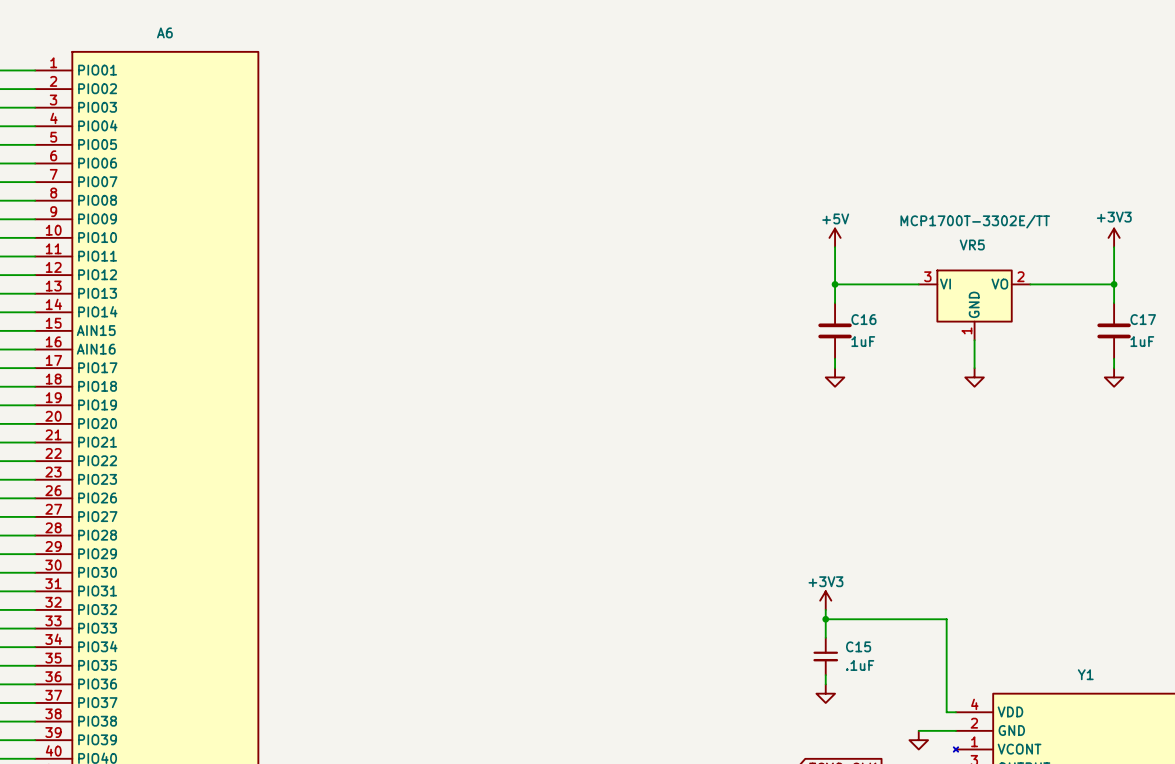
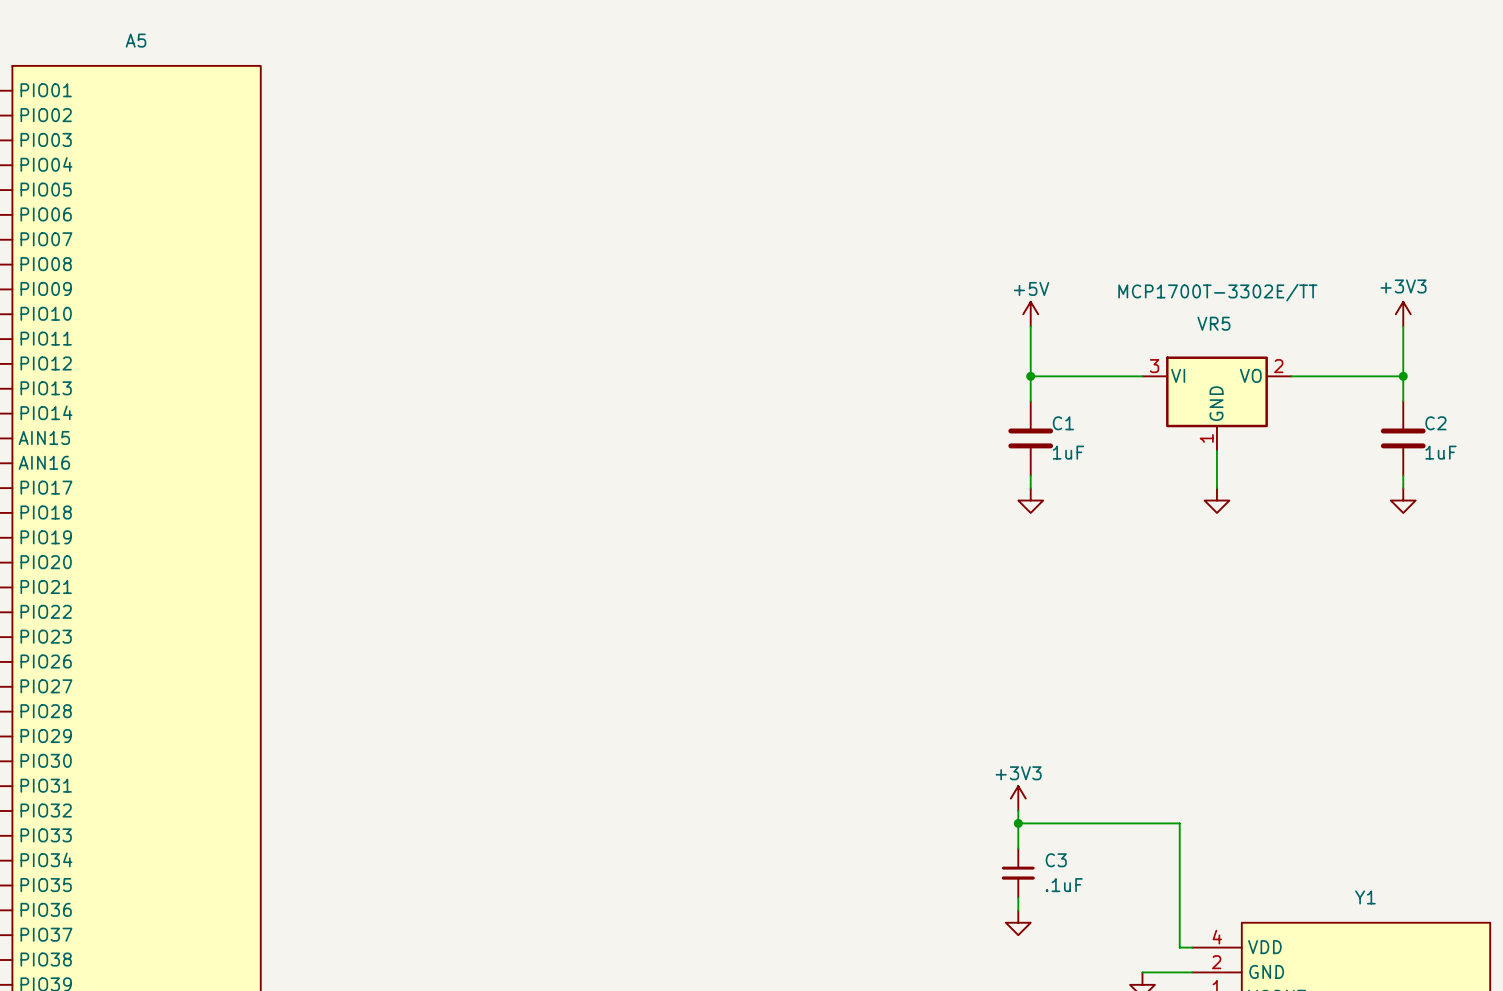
A6 name: A6 (164, 32) -> A5 (136, 40)
C16 name: C16 (863, 319) -> C1 (1063, 423)
C17 name: C17 (1143, 319) -> C2 (1435, 423)
C15 name: C15 (858, 646) -> C3 (1056, 860)

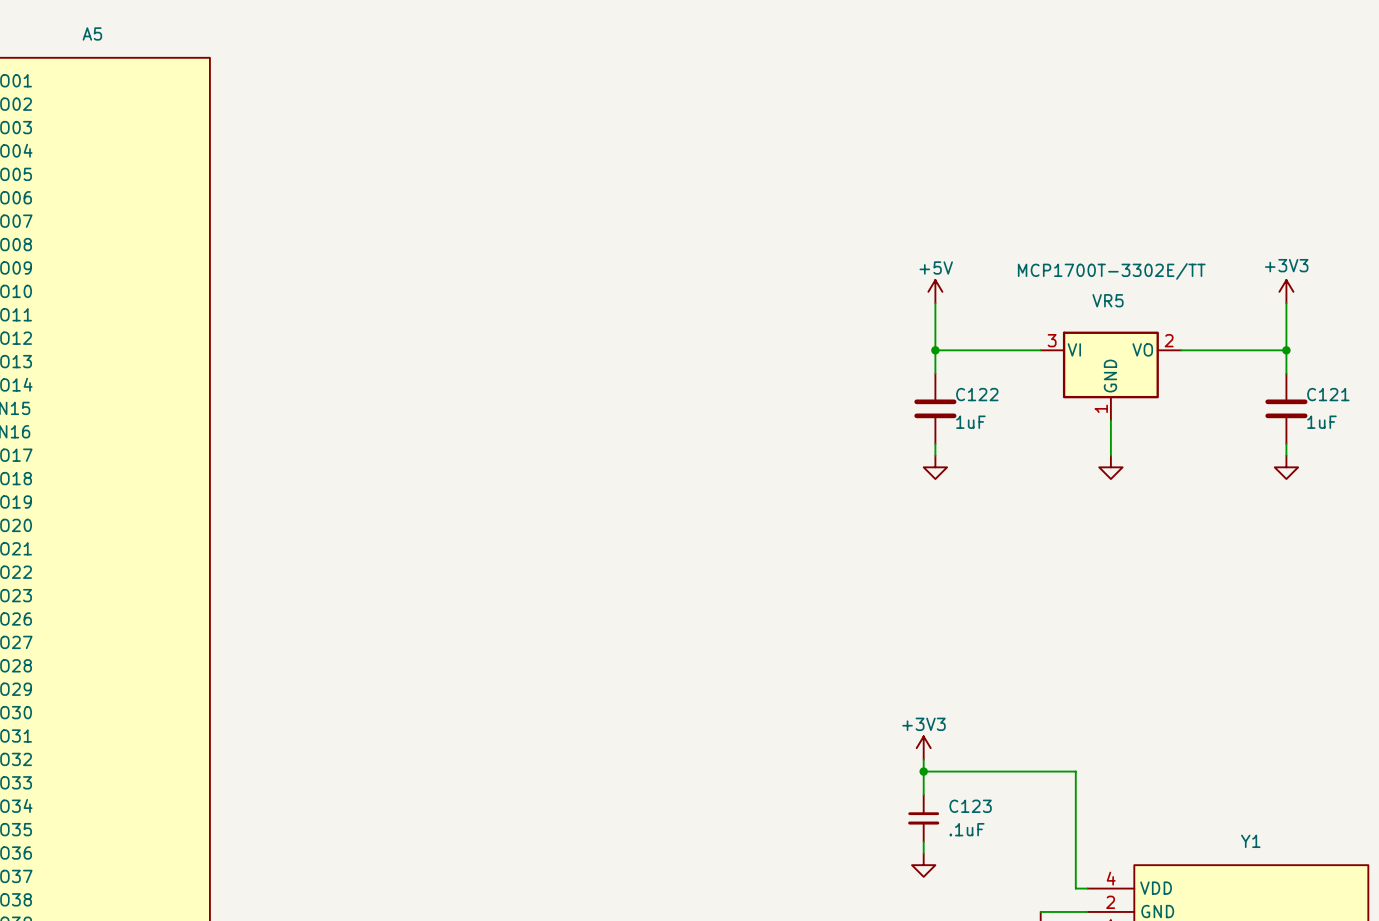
C1 name: C1 (1063, 423) -> C122 (977, 394)
C2 name: C2 (1435, 423) -> C121 (1328, 394)
C3 name: C3 (1056, 860) -> C123 (970, 806)

